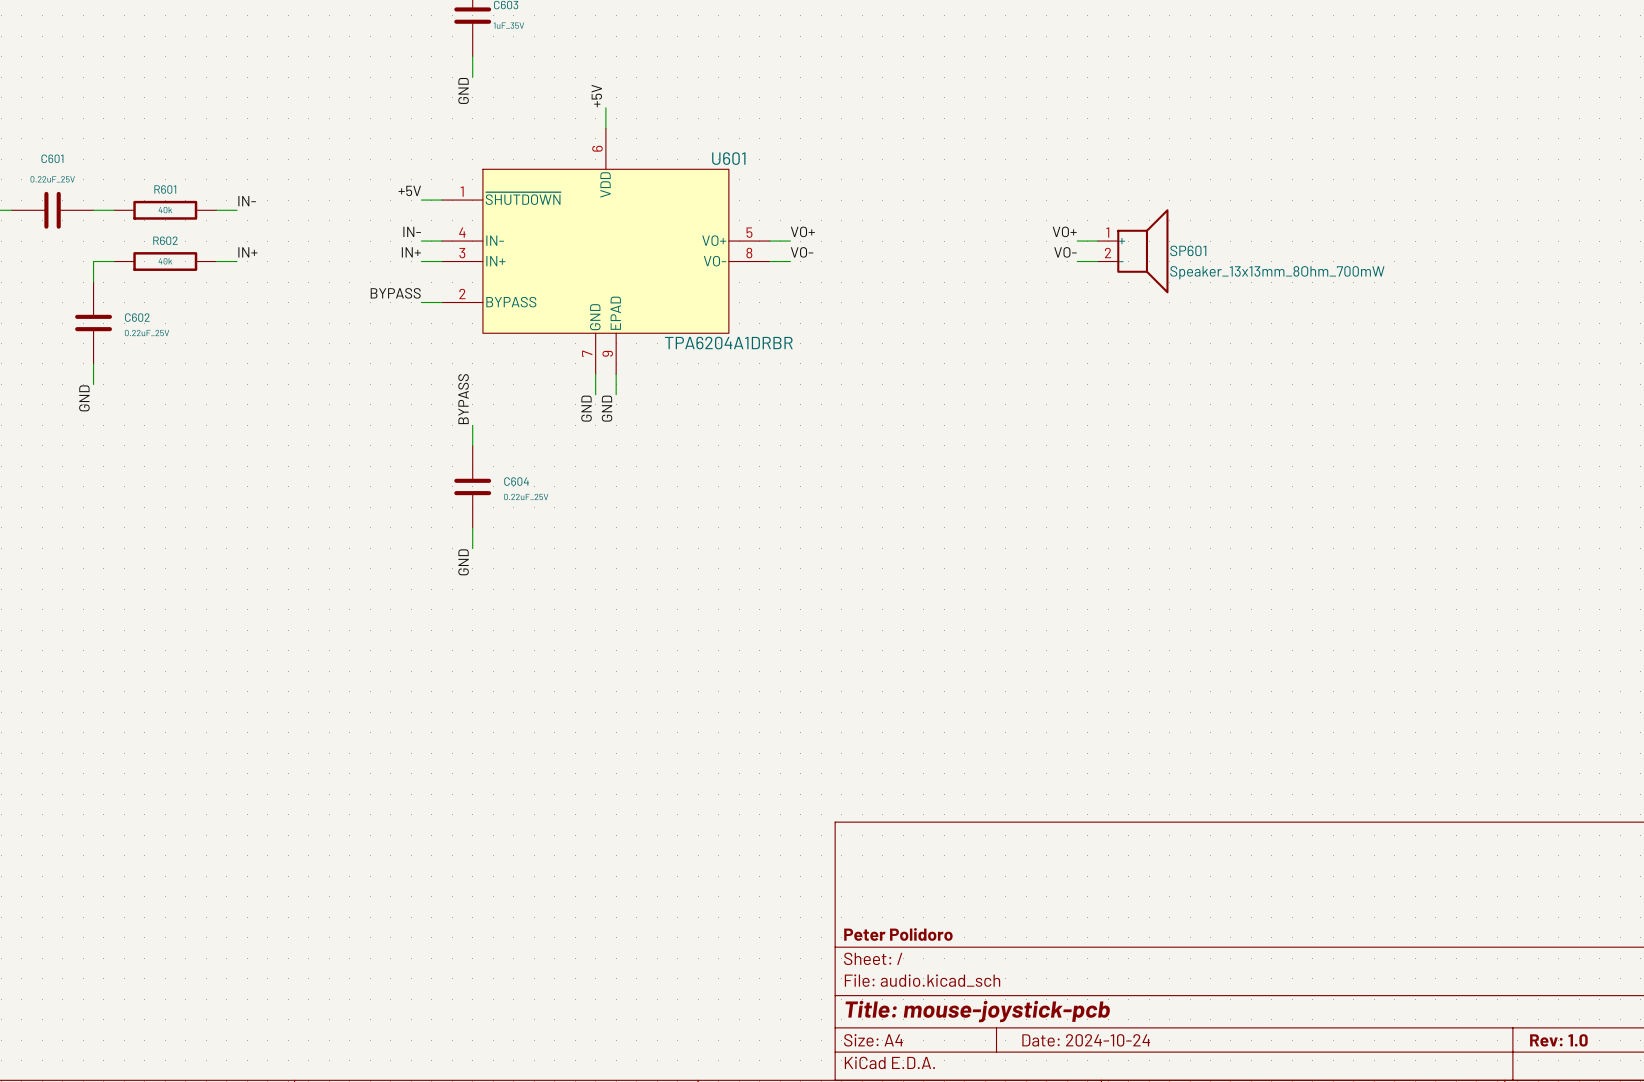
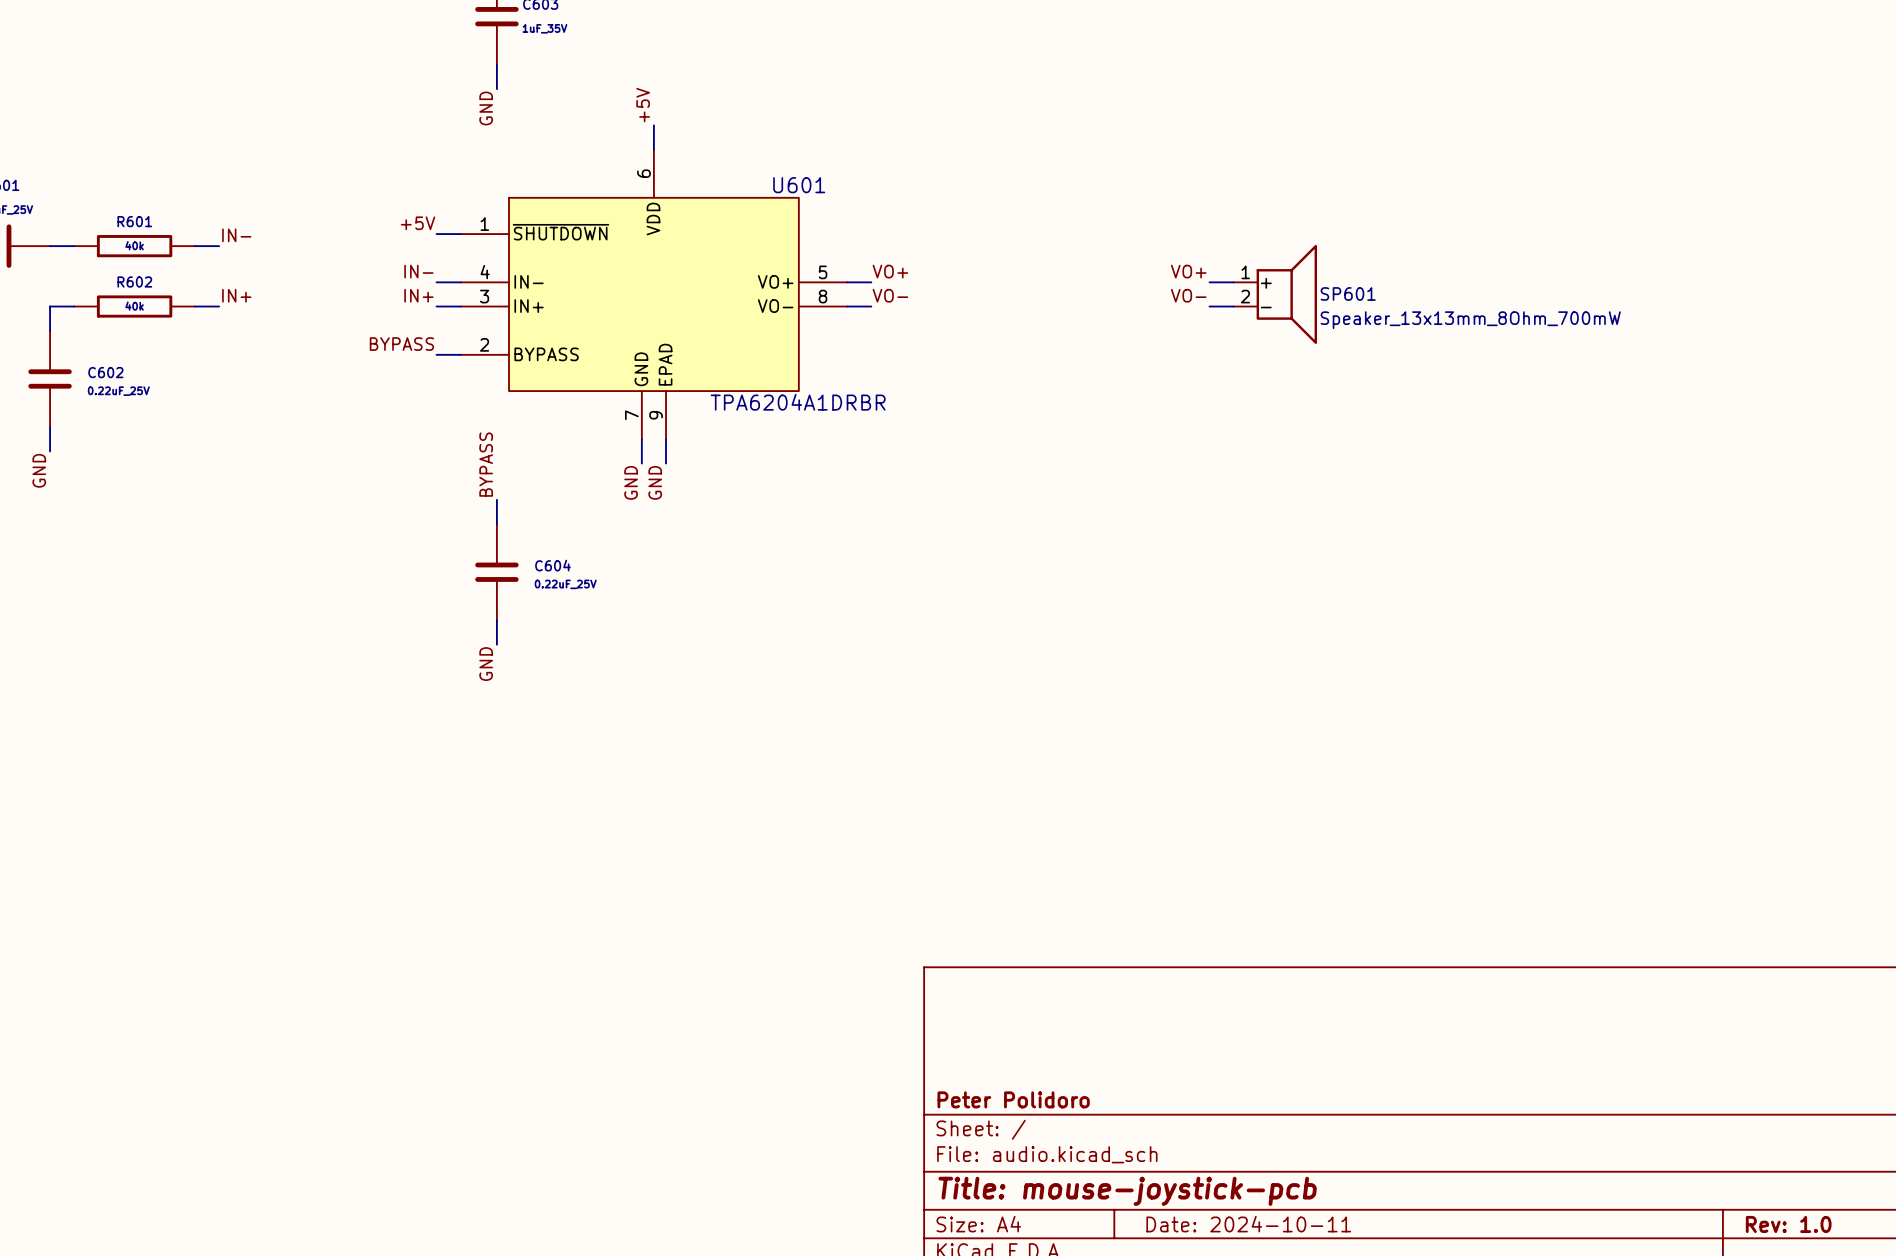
title block: Date: 2024-10-24 (1086, 1040) -> Date: 2024-10-11 (1248, 1224)

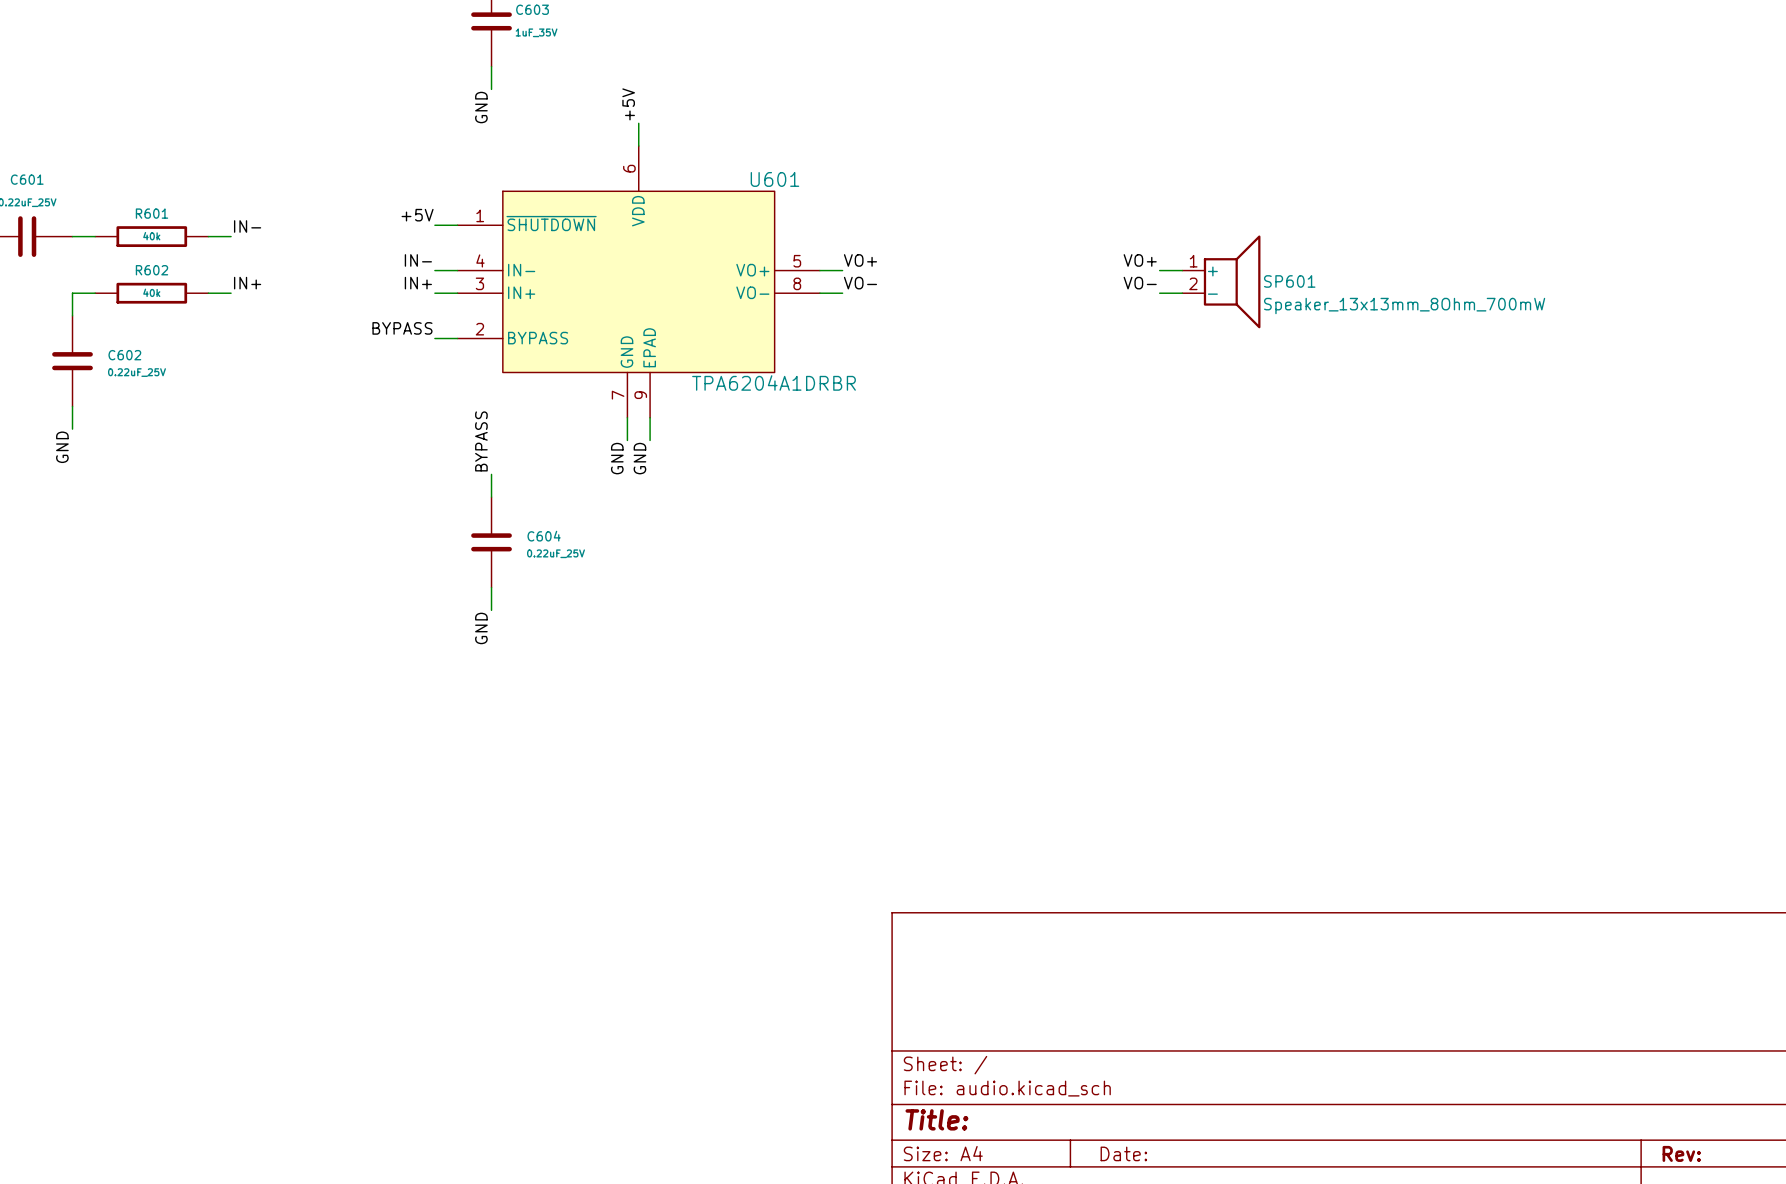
title block: Peter Polidoro (1013, 1099) -> none
title block: Title: mouse-joystick-pcb (1127, 1191) -> Title: (936, 1119)
title block: Date: 2024-10-11 (1248, 1224) -> Date: (1123, 1153)
title block: Rev: 1.0 (1788, 1224) -> Rev: (1681, 1153)

